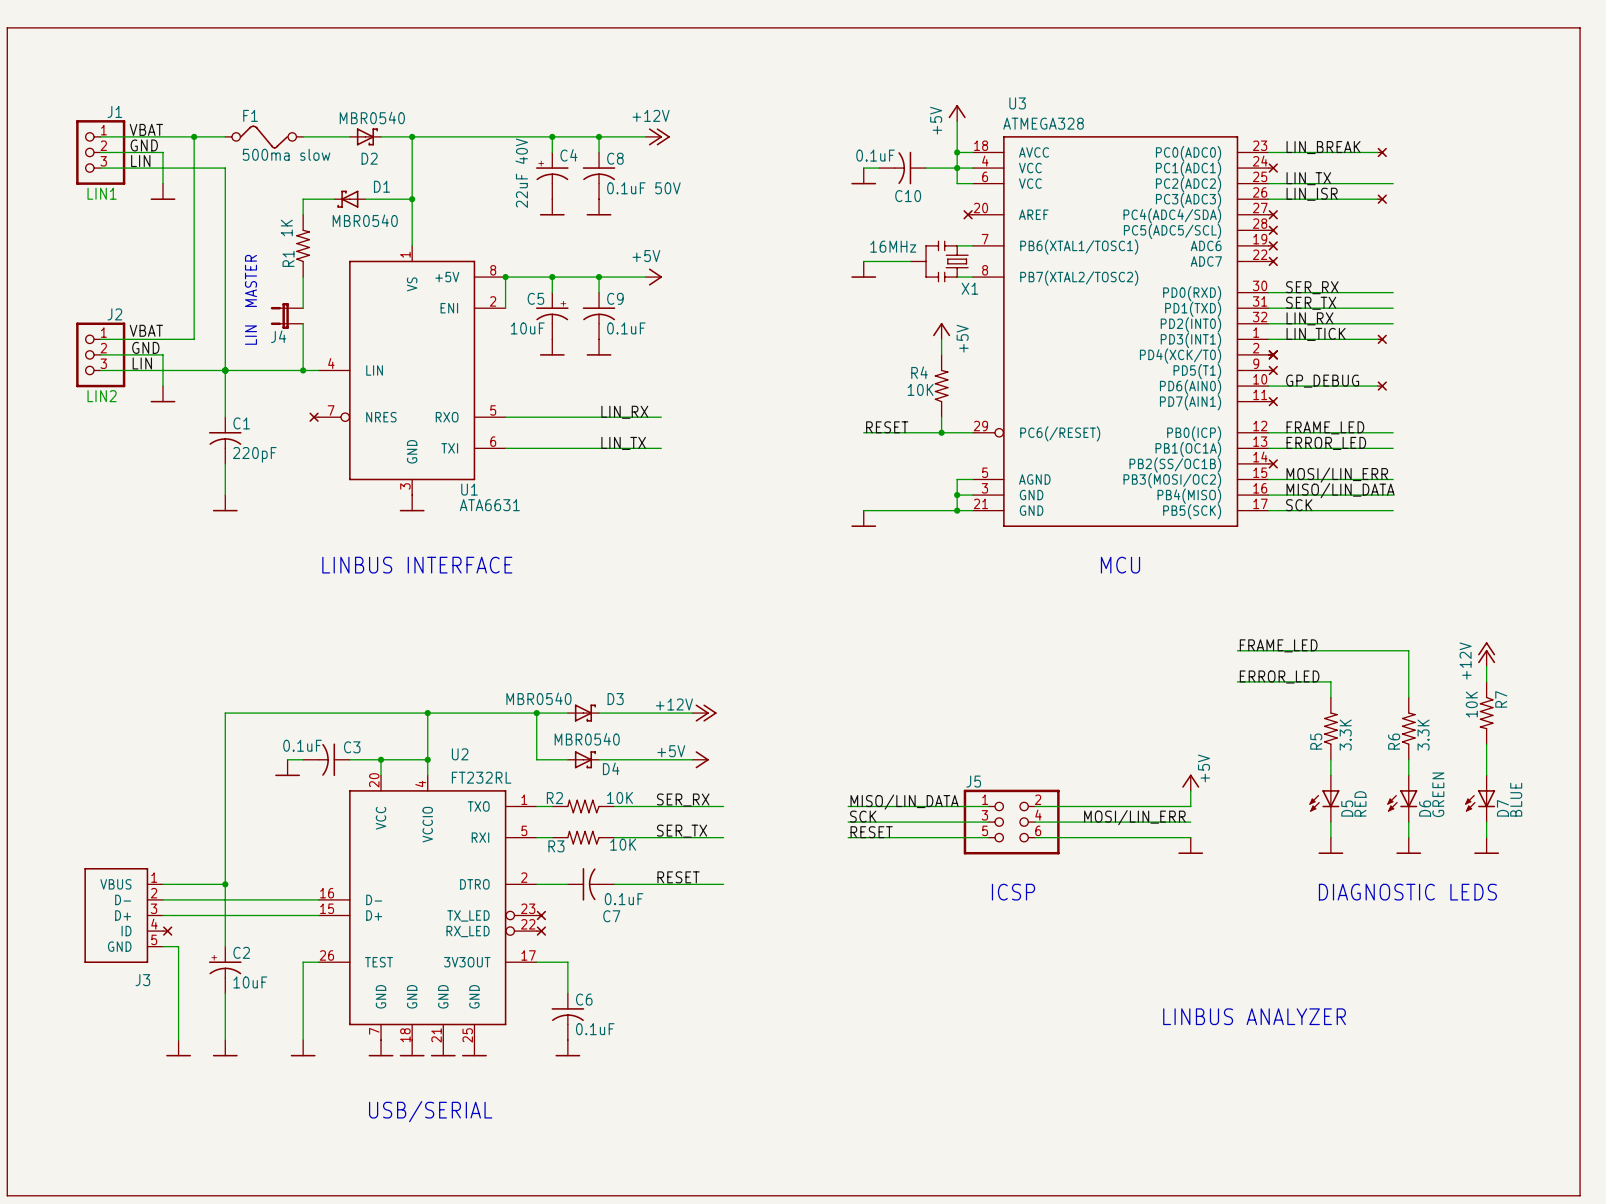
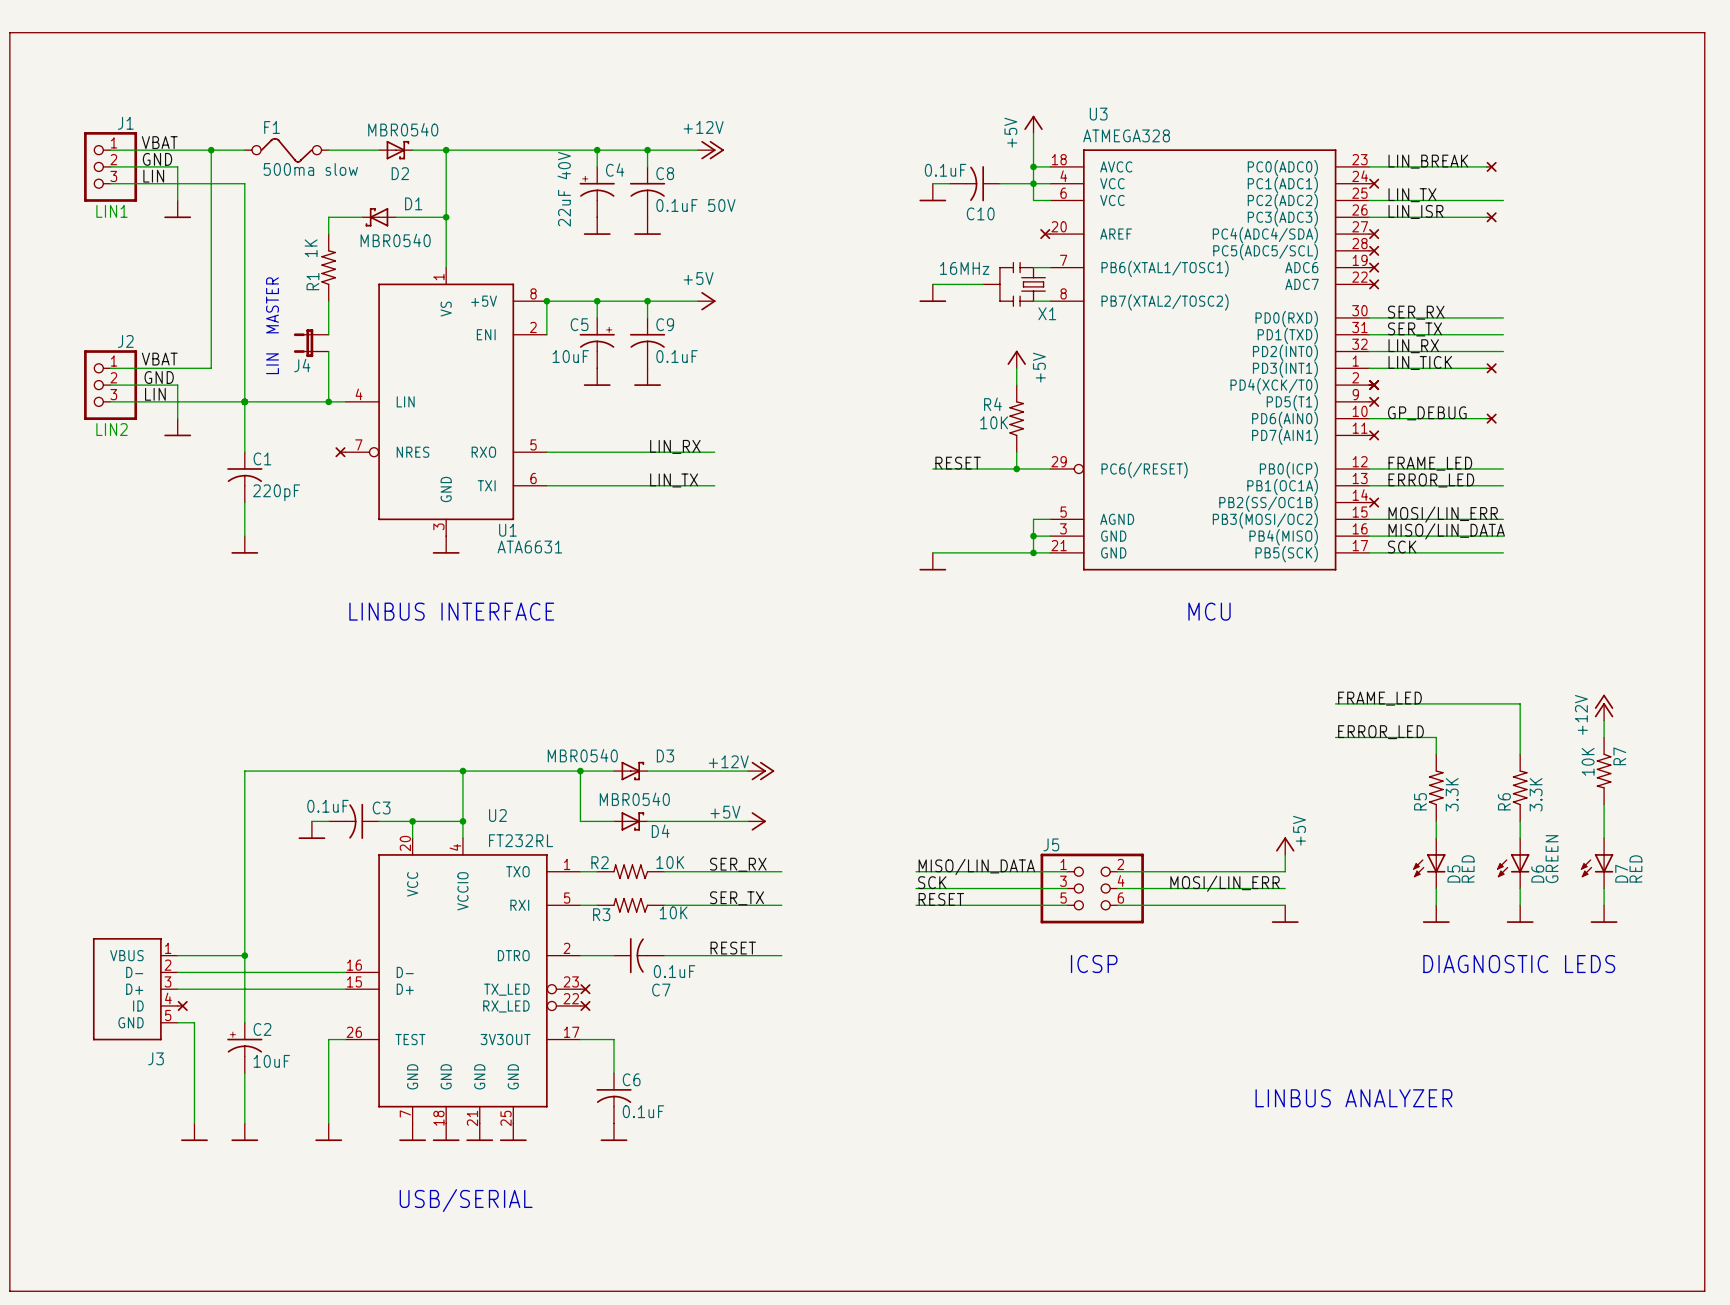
D7 value: BLUE (1516, 799) -> RED (1635, 868)

